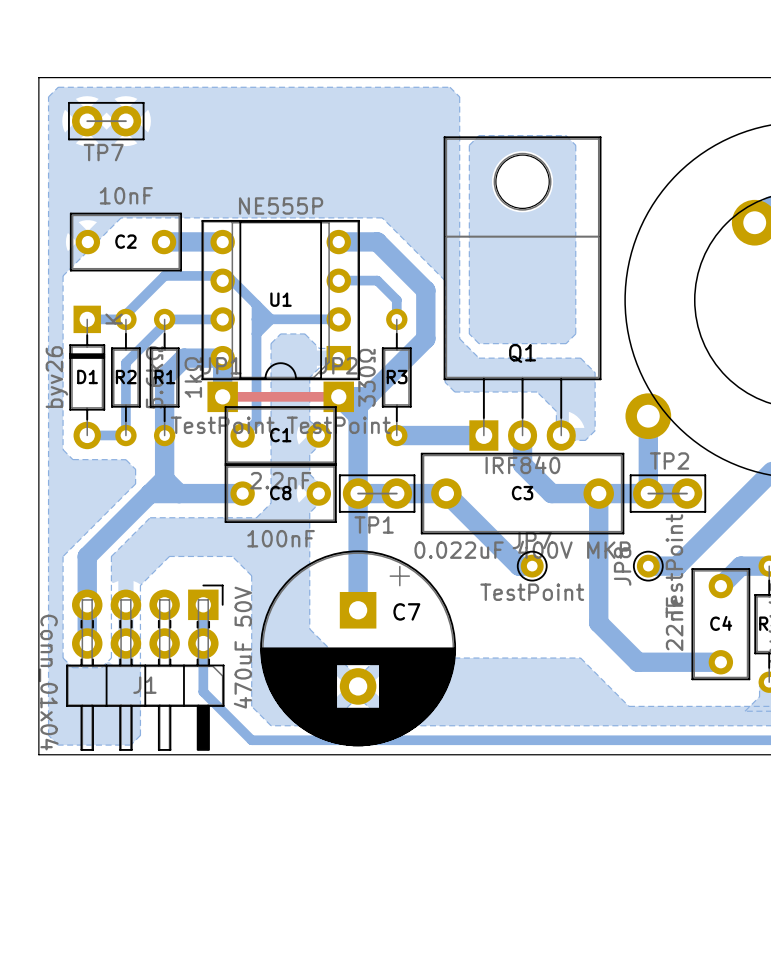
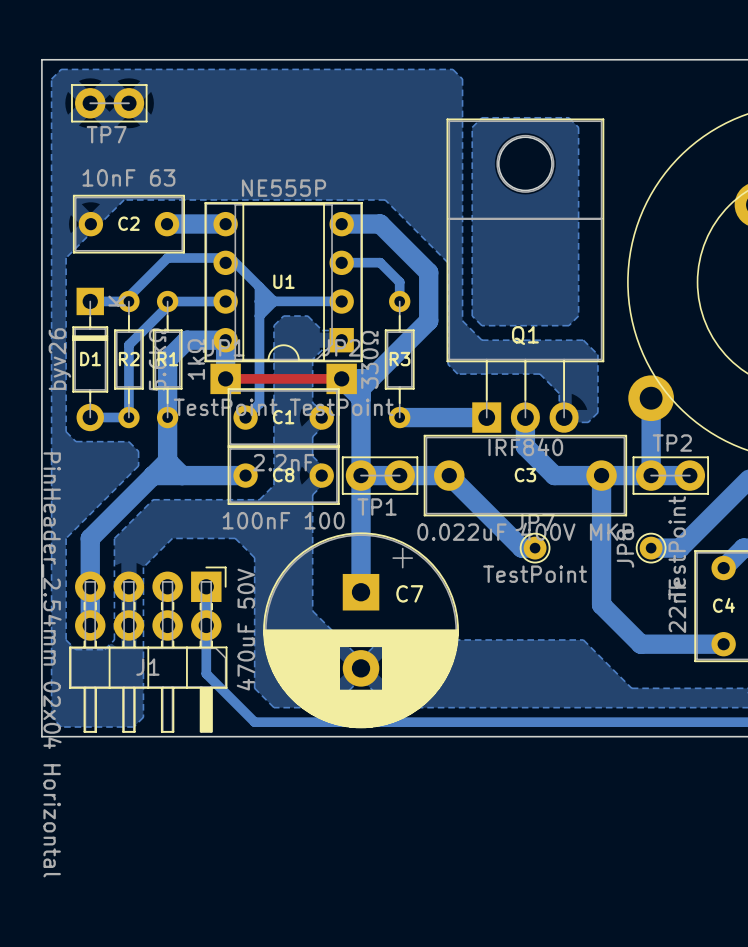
C2 value: 10nF (126, 195) -> 10nF 63 (128, 177)
C8 value: 100nF (281, 538) -> 100nF 100 (283, 520)
J1 value: Conn_01x04 (48, 682) -> PinHeader_2.54mm 02x04 Horizontal (51, 664)

